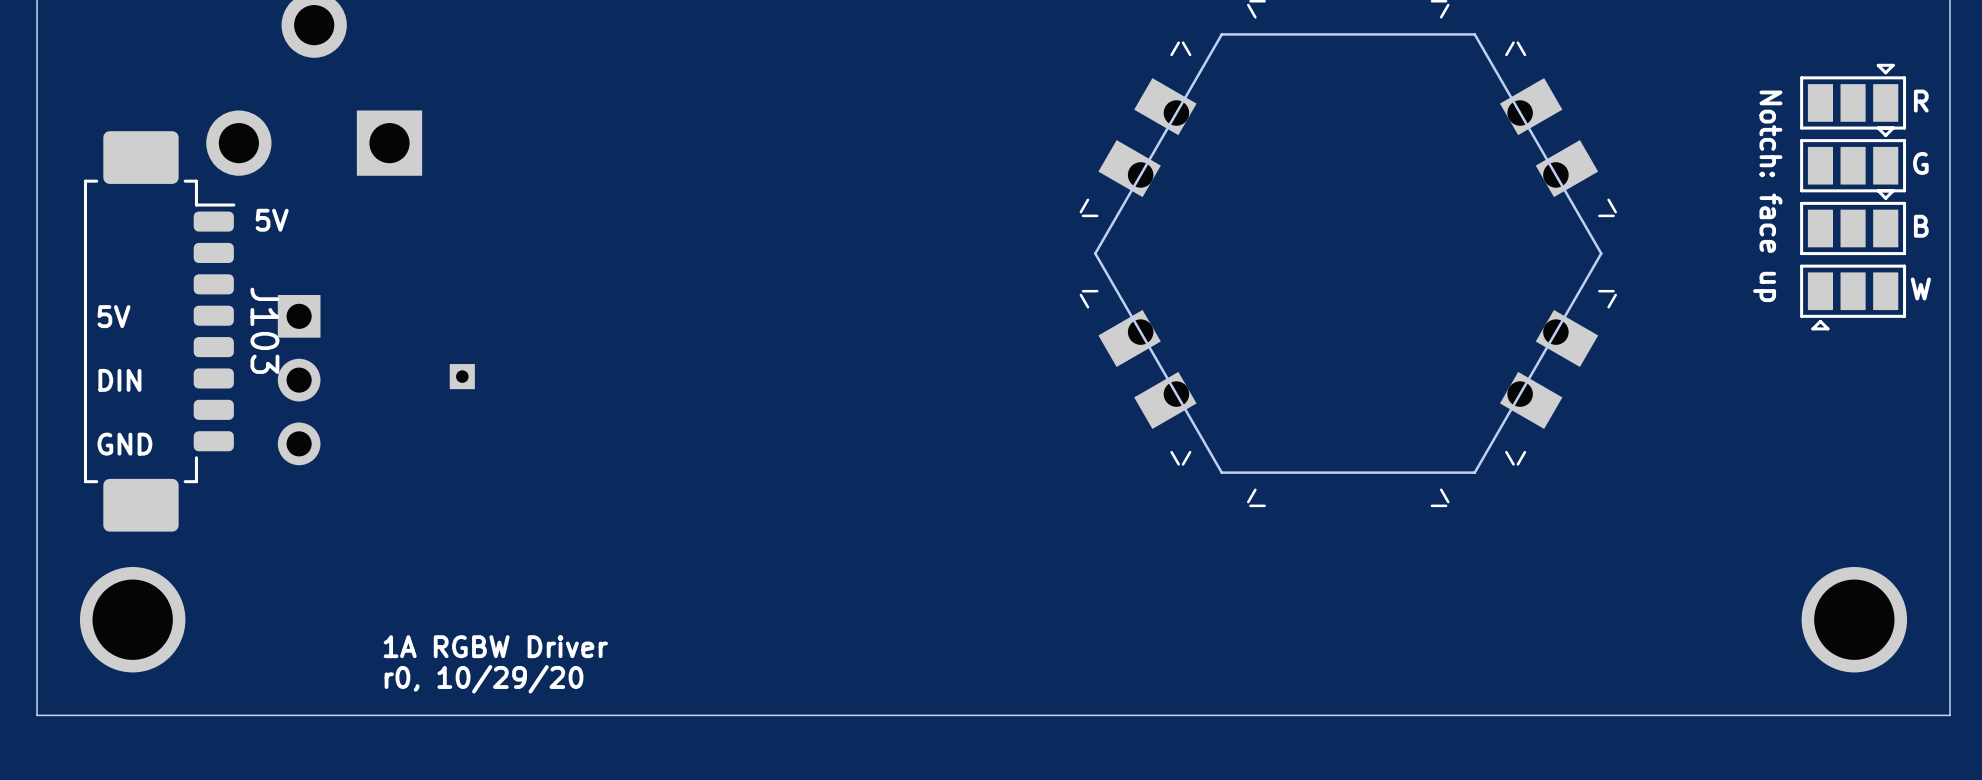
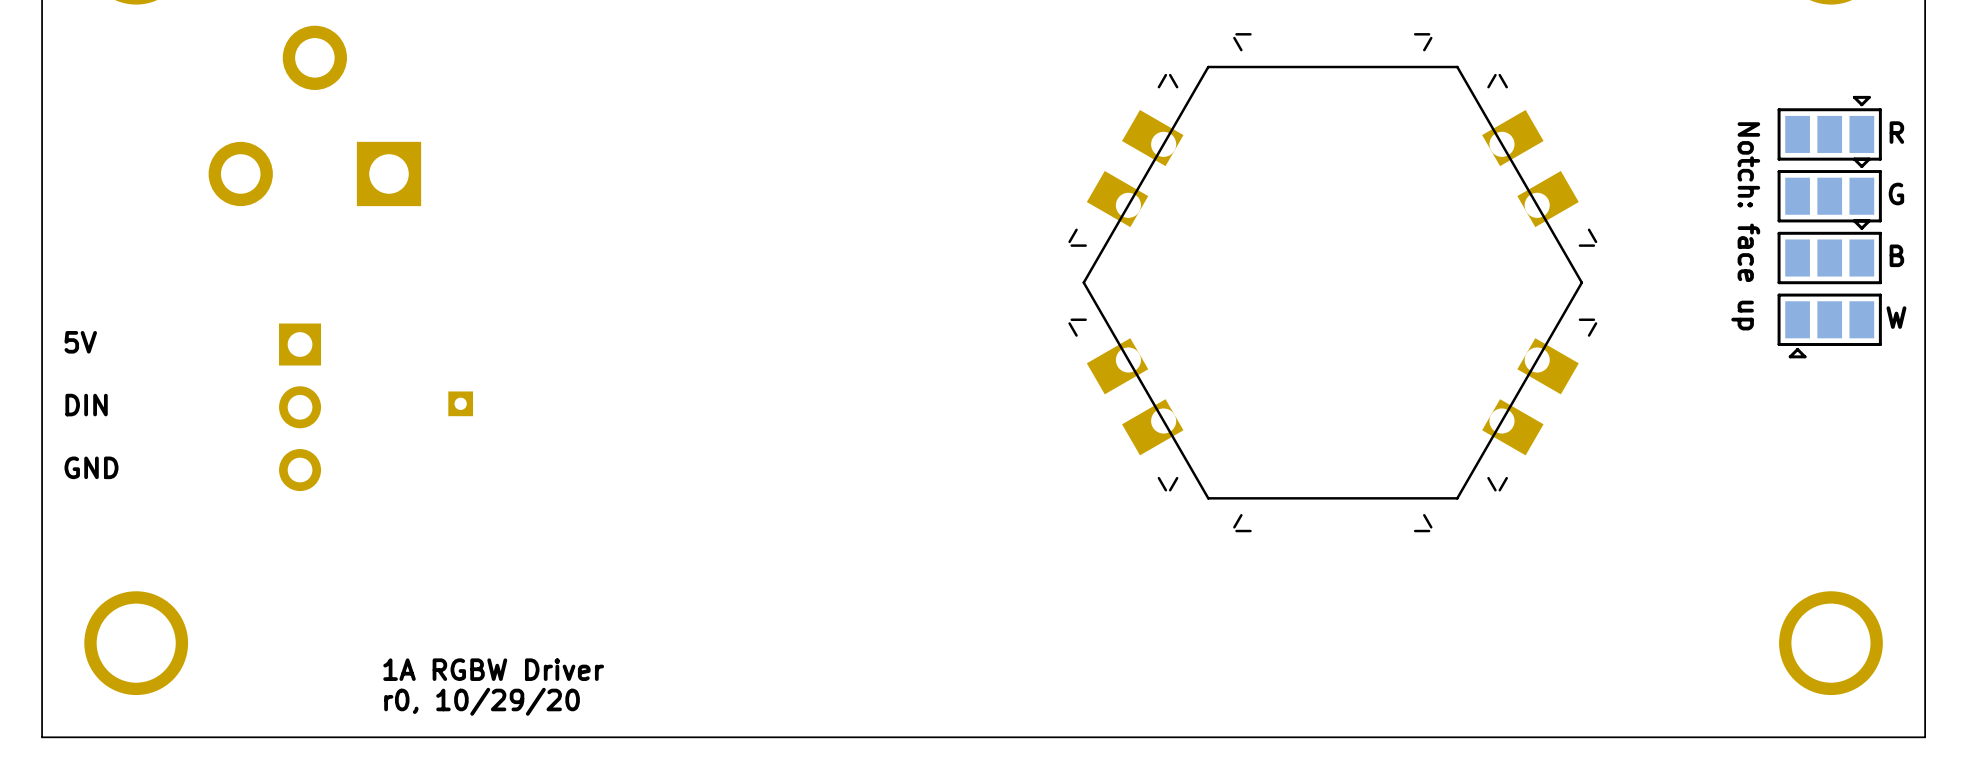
text: 5V (272, 220) -> none
text position: 5V (114, 316) -> 5V (80, 342)
J103: (159, 331) -> none
text position: DIN (119, 380) -> DIN (86, 405)
text position: GND (124, 444) -> GND (91, 467)

